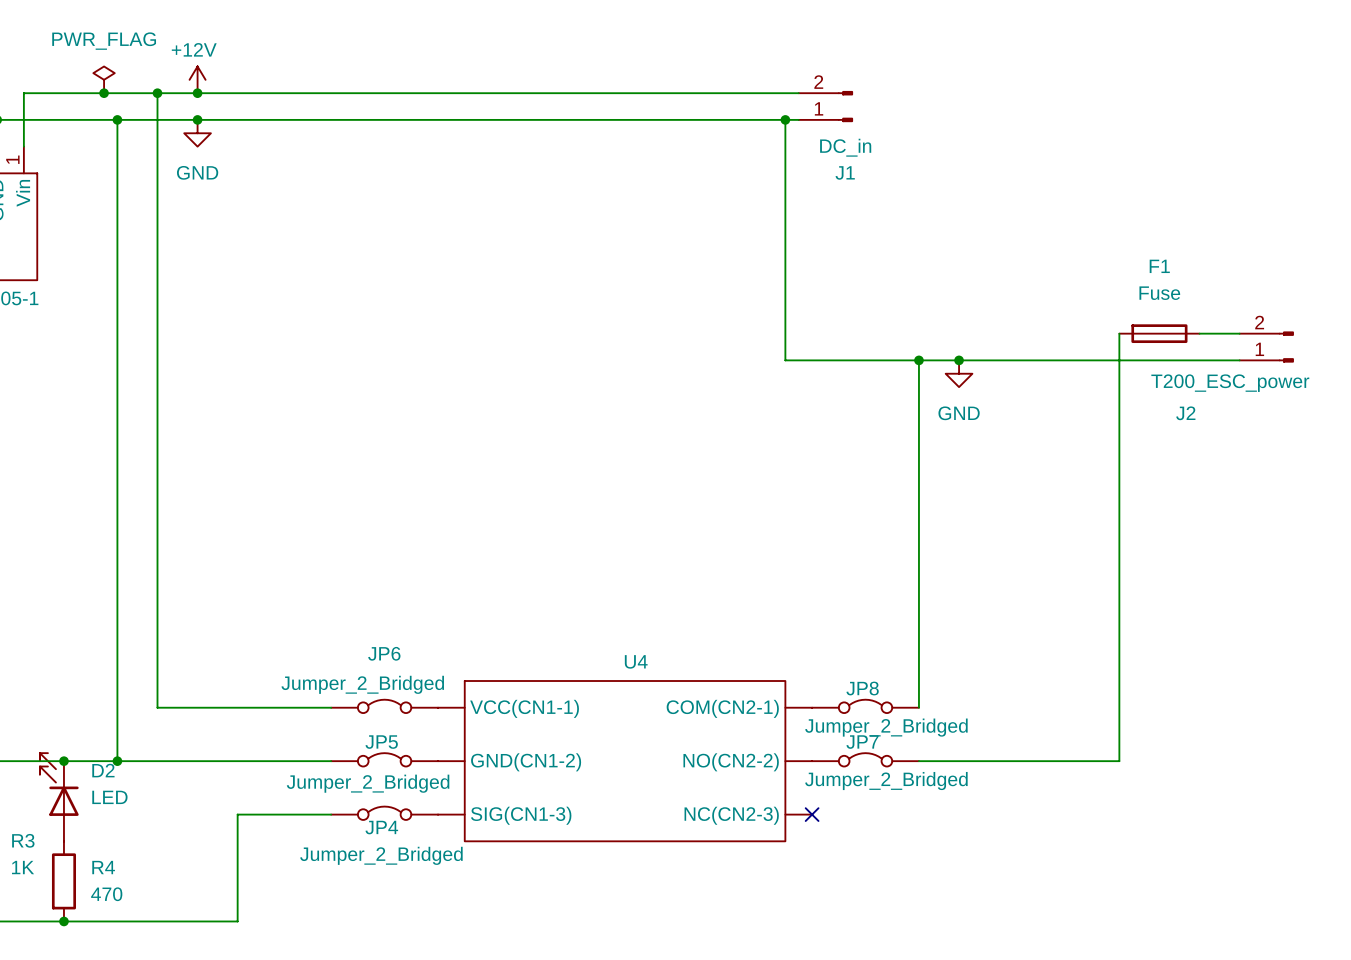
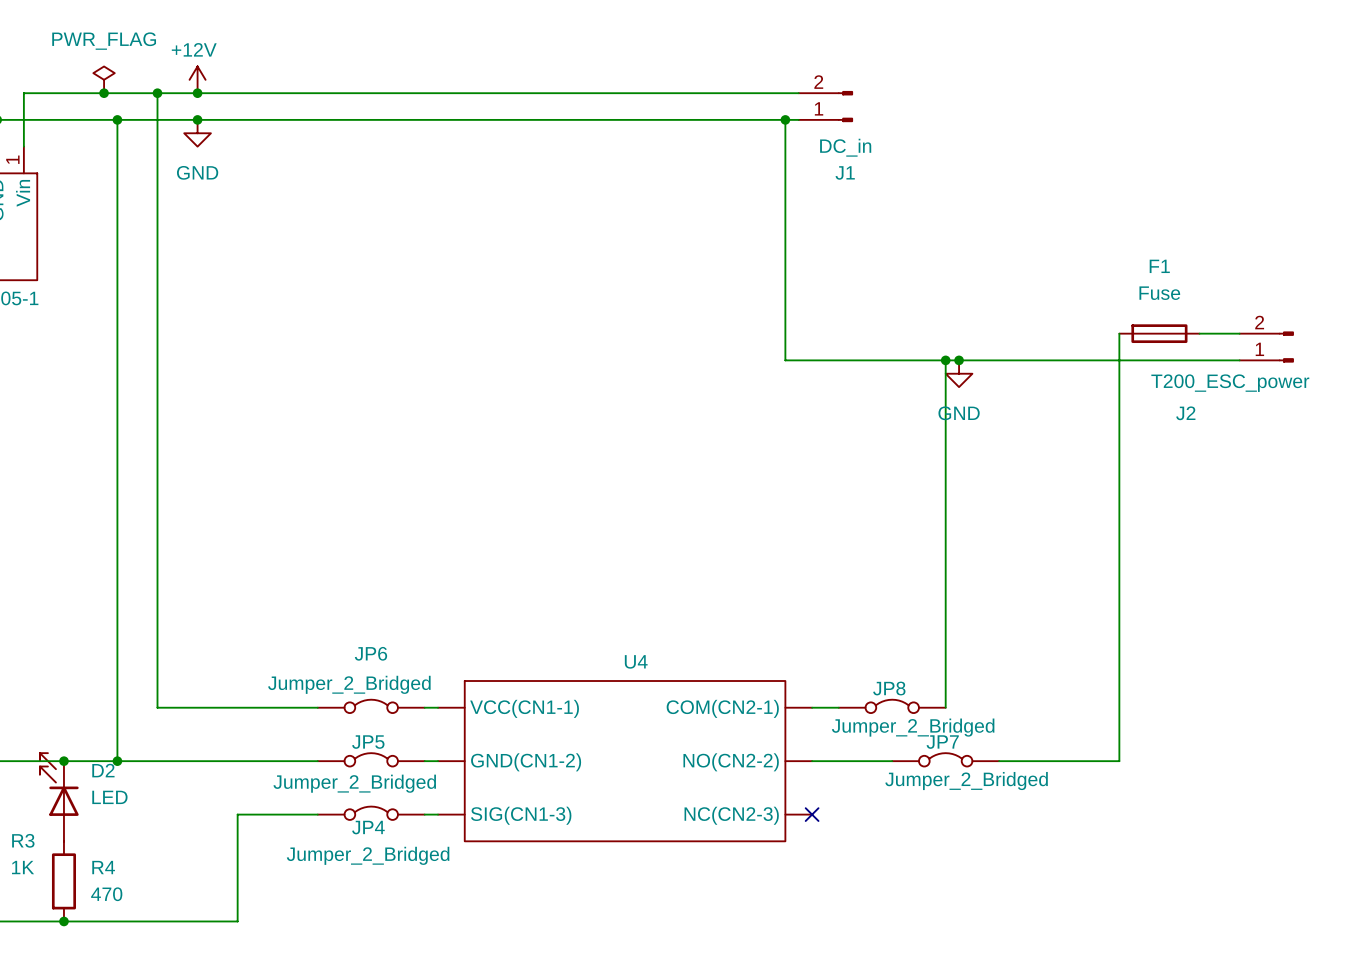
wire: (918, 360) (918, 707) -> (945, 360) (945, 707)
junction position: (918, 360) -> (945, 360)
JP6 position: (384, 706) -> (371, 706)
JP8 position: (865, 706) -> (892, 706)
JP5 position: (384, 759) -> (371, 759)
JP7 position: (865, 759) -> (945, 759)
wire: (918, 761) (999, 761) -> (812, 761) (892, 761)
JP4 position: (384, 813) -> (371, 813)

